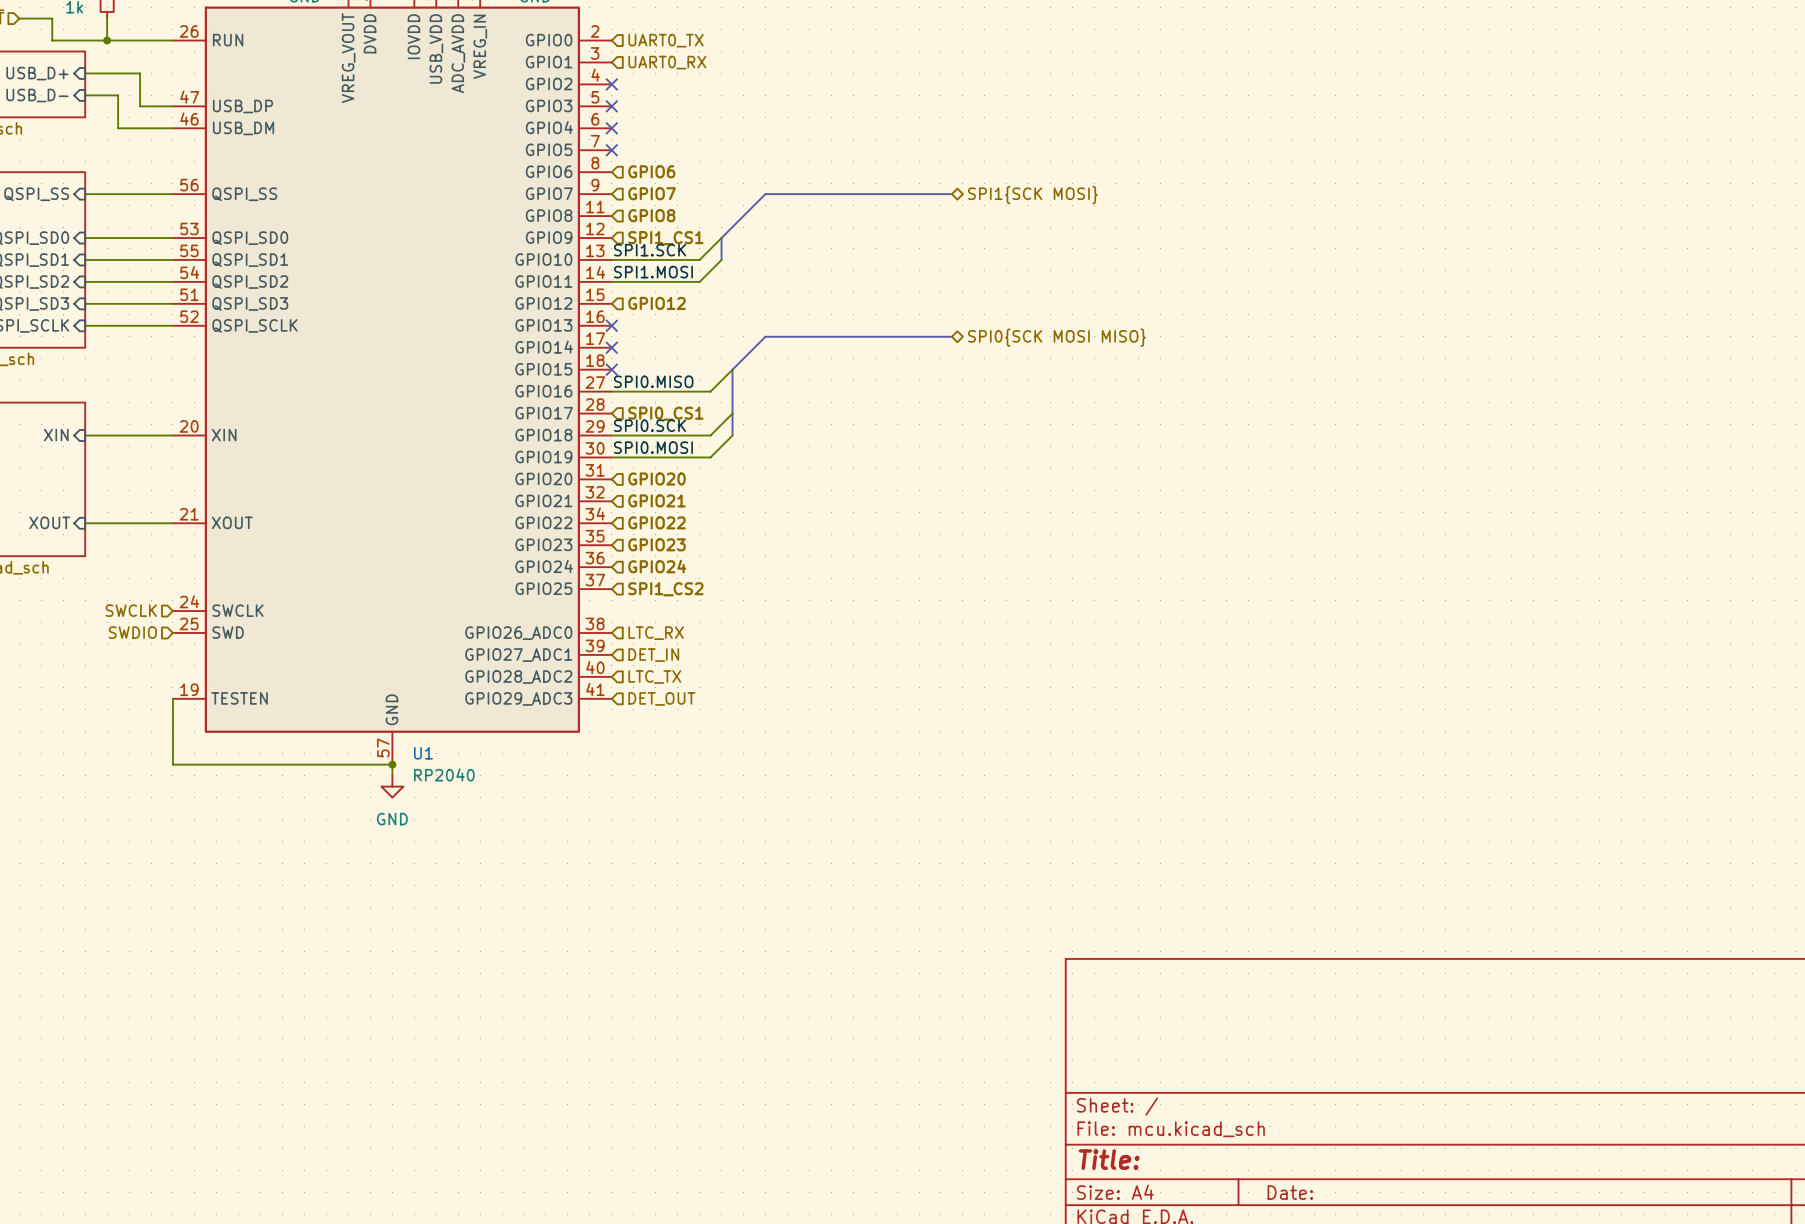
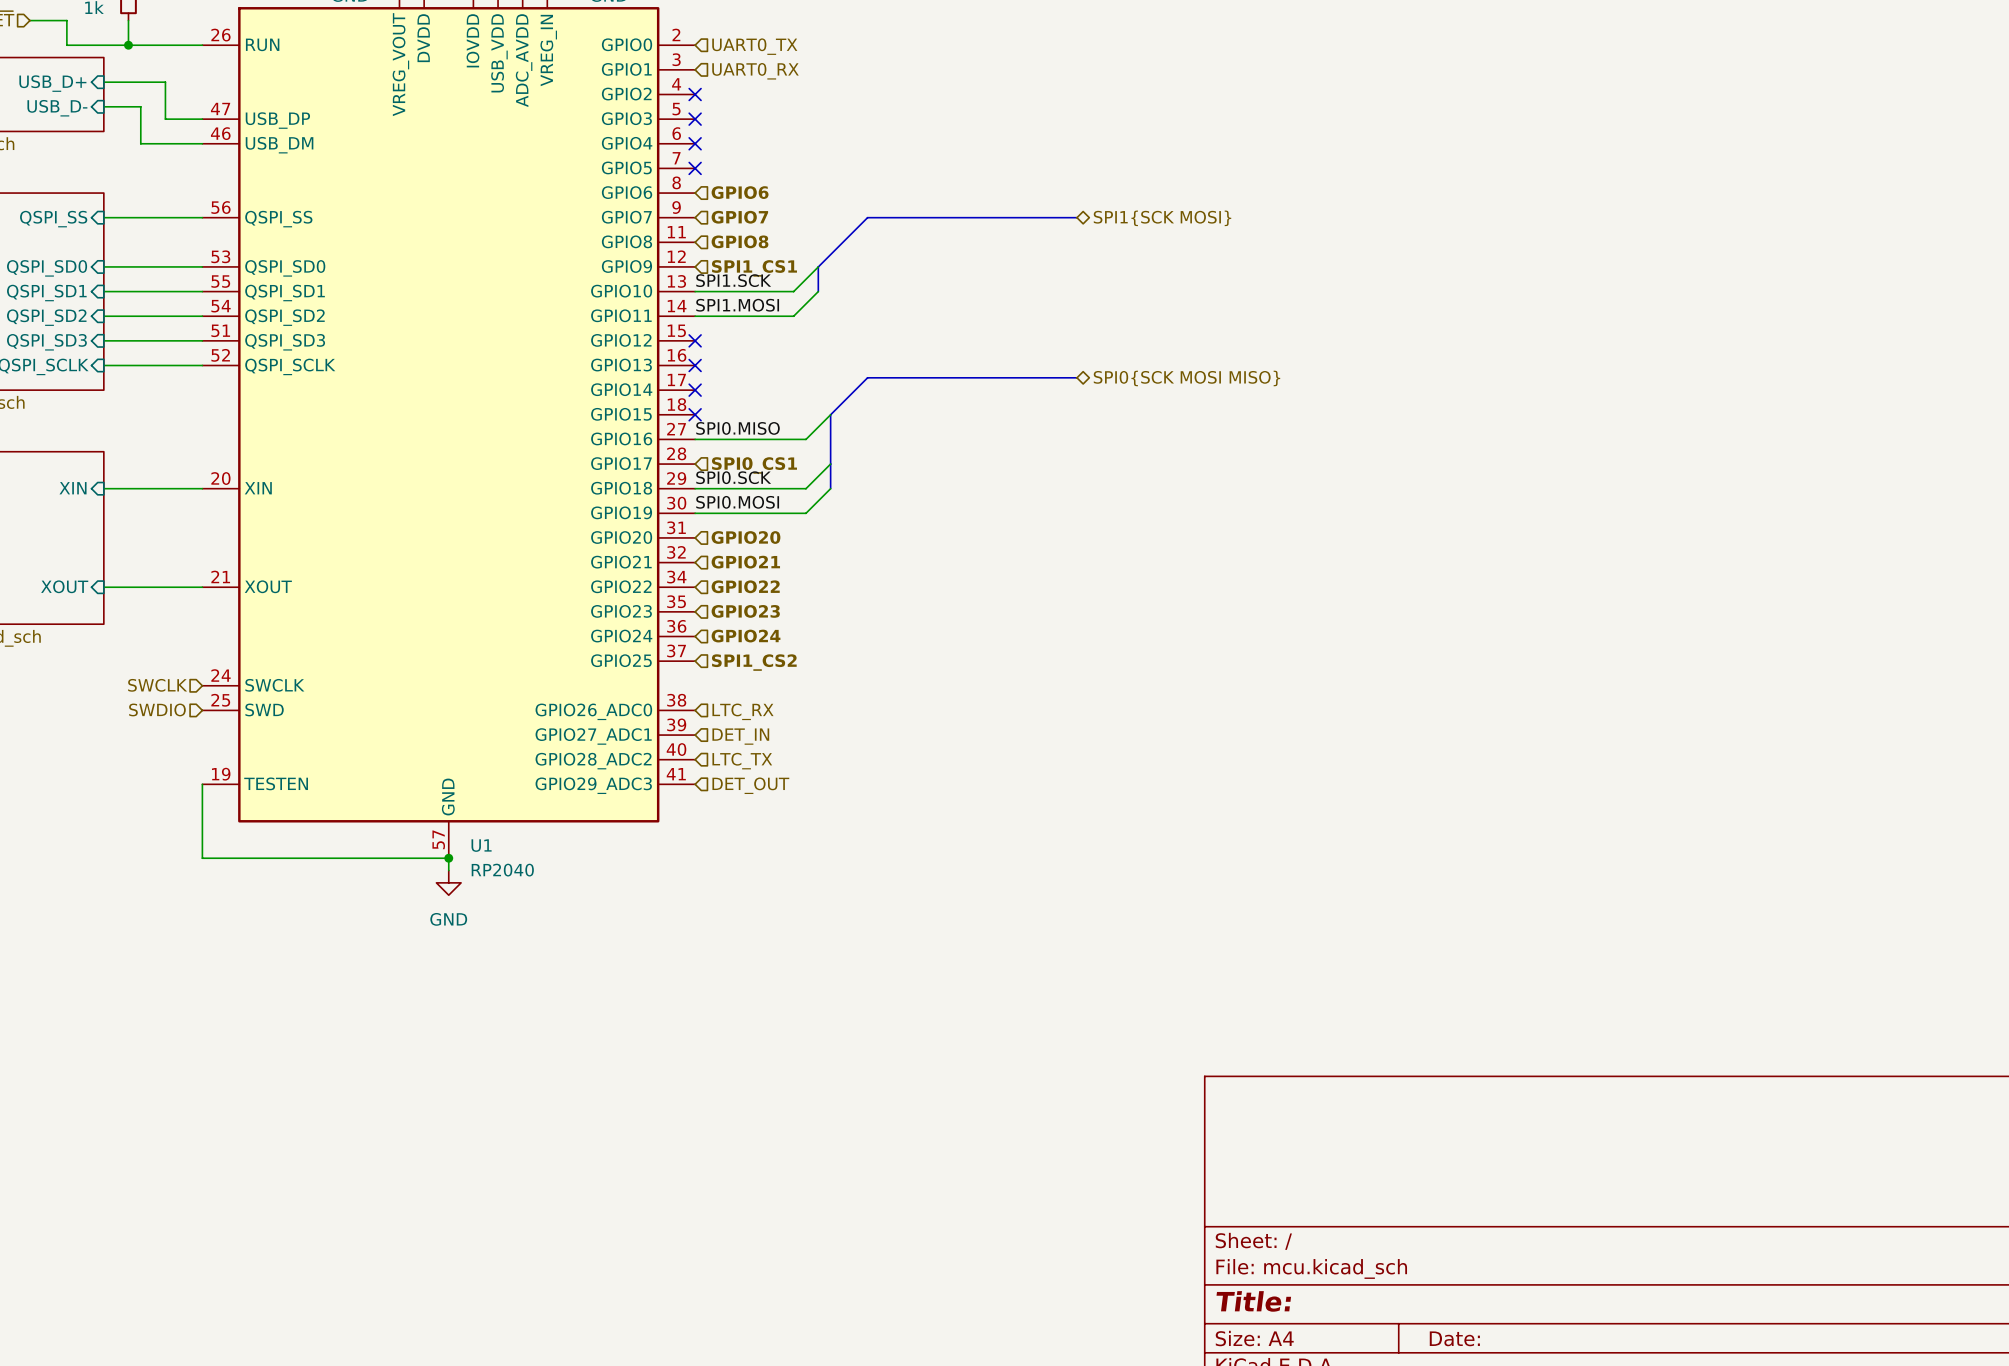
no-connect mark: none -> (695, 340)
hierarchical label: GPIO12 (656, 303) -> none

